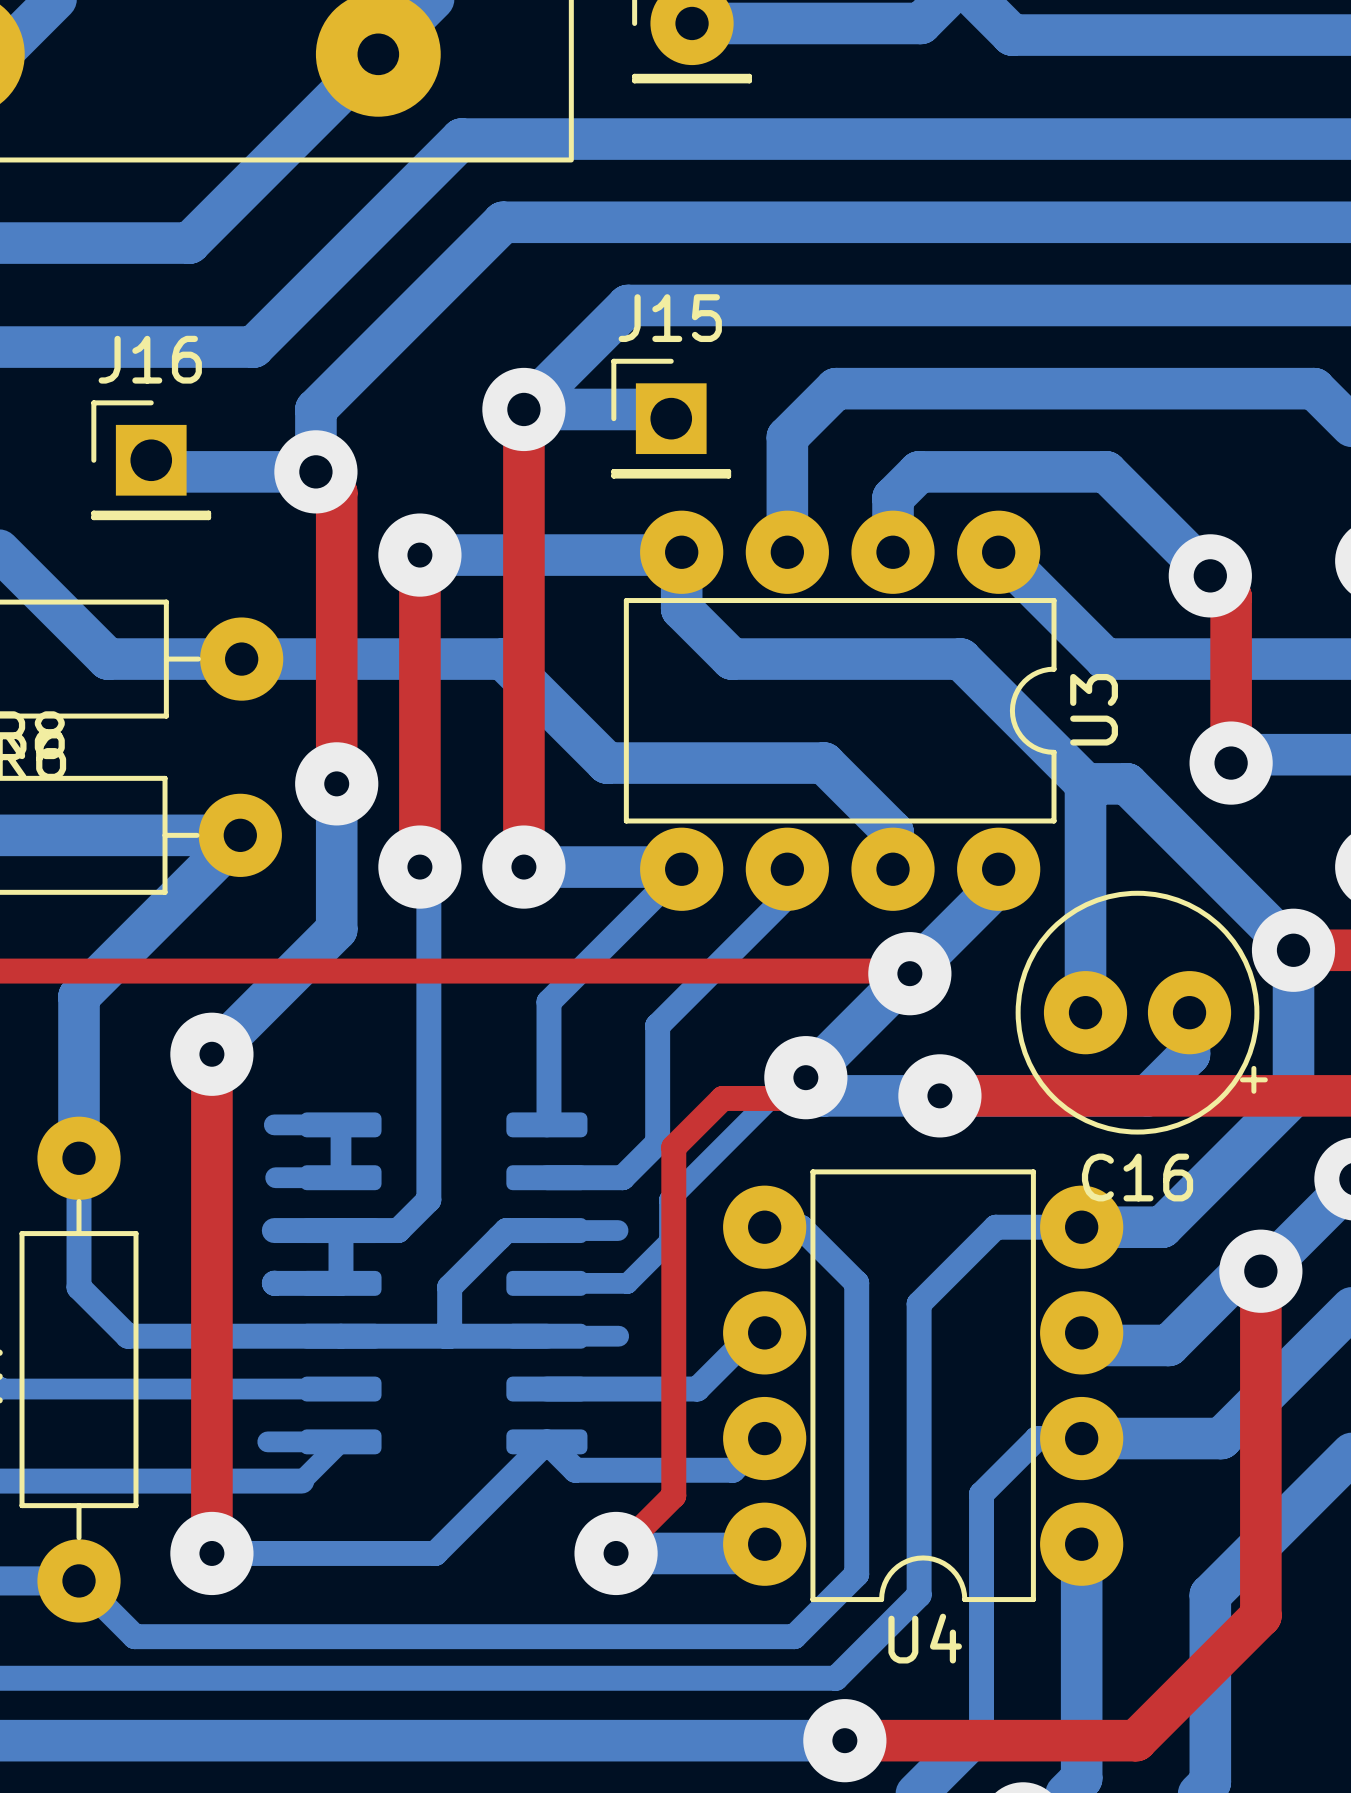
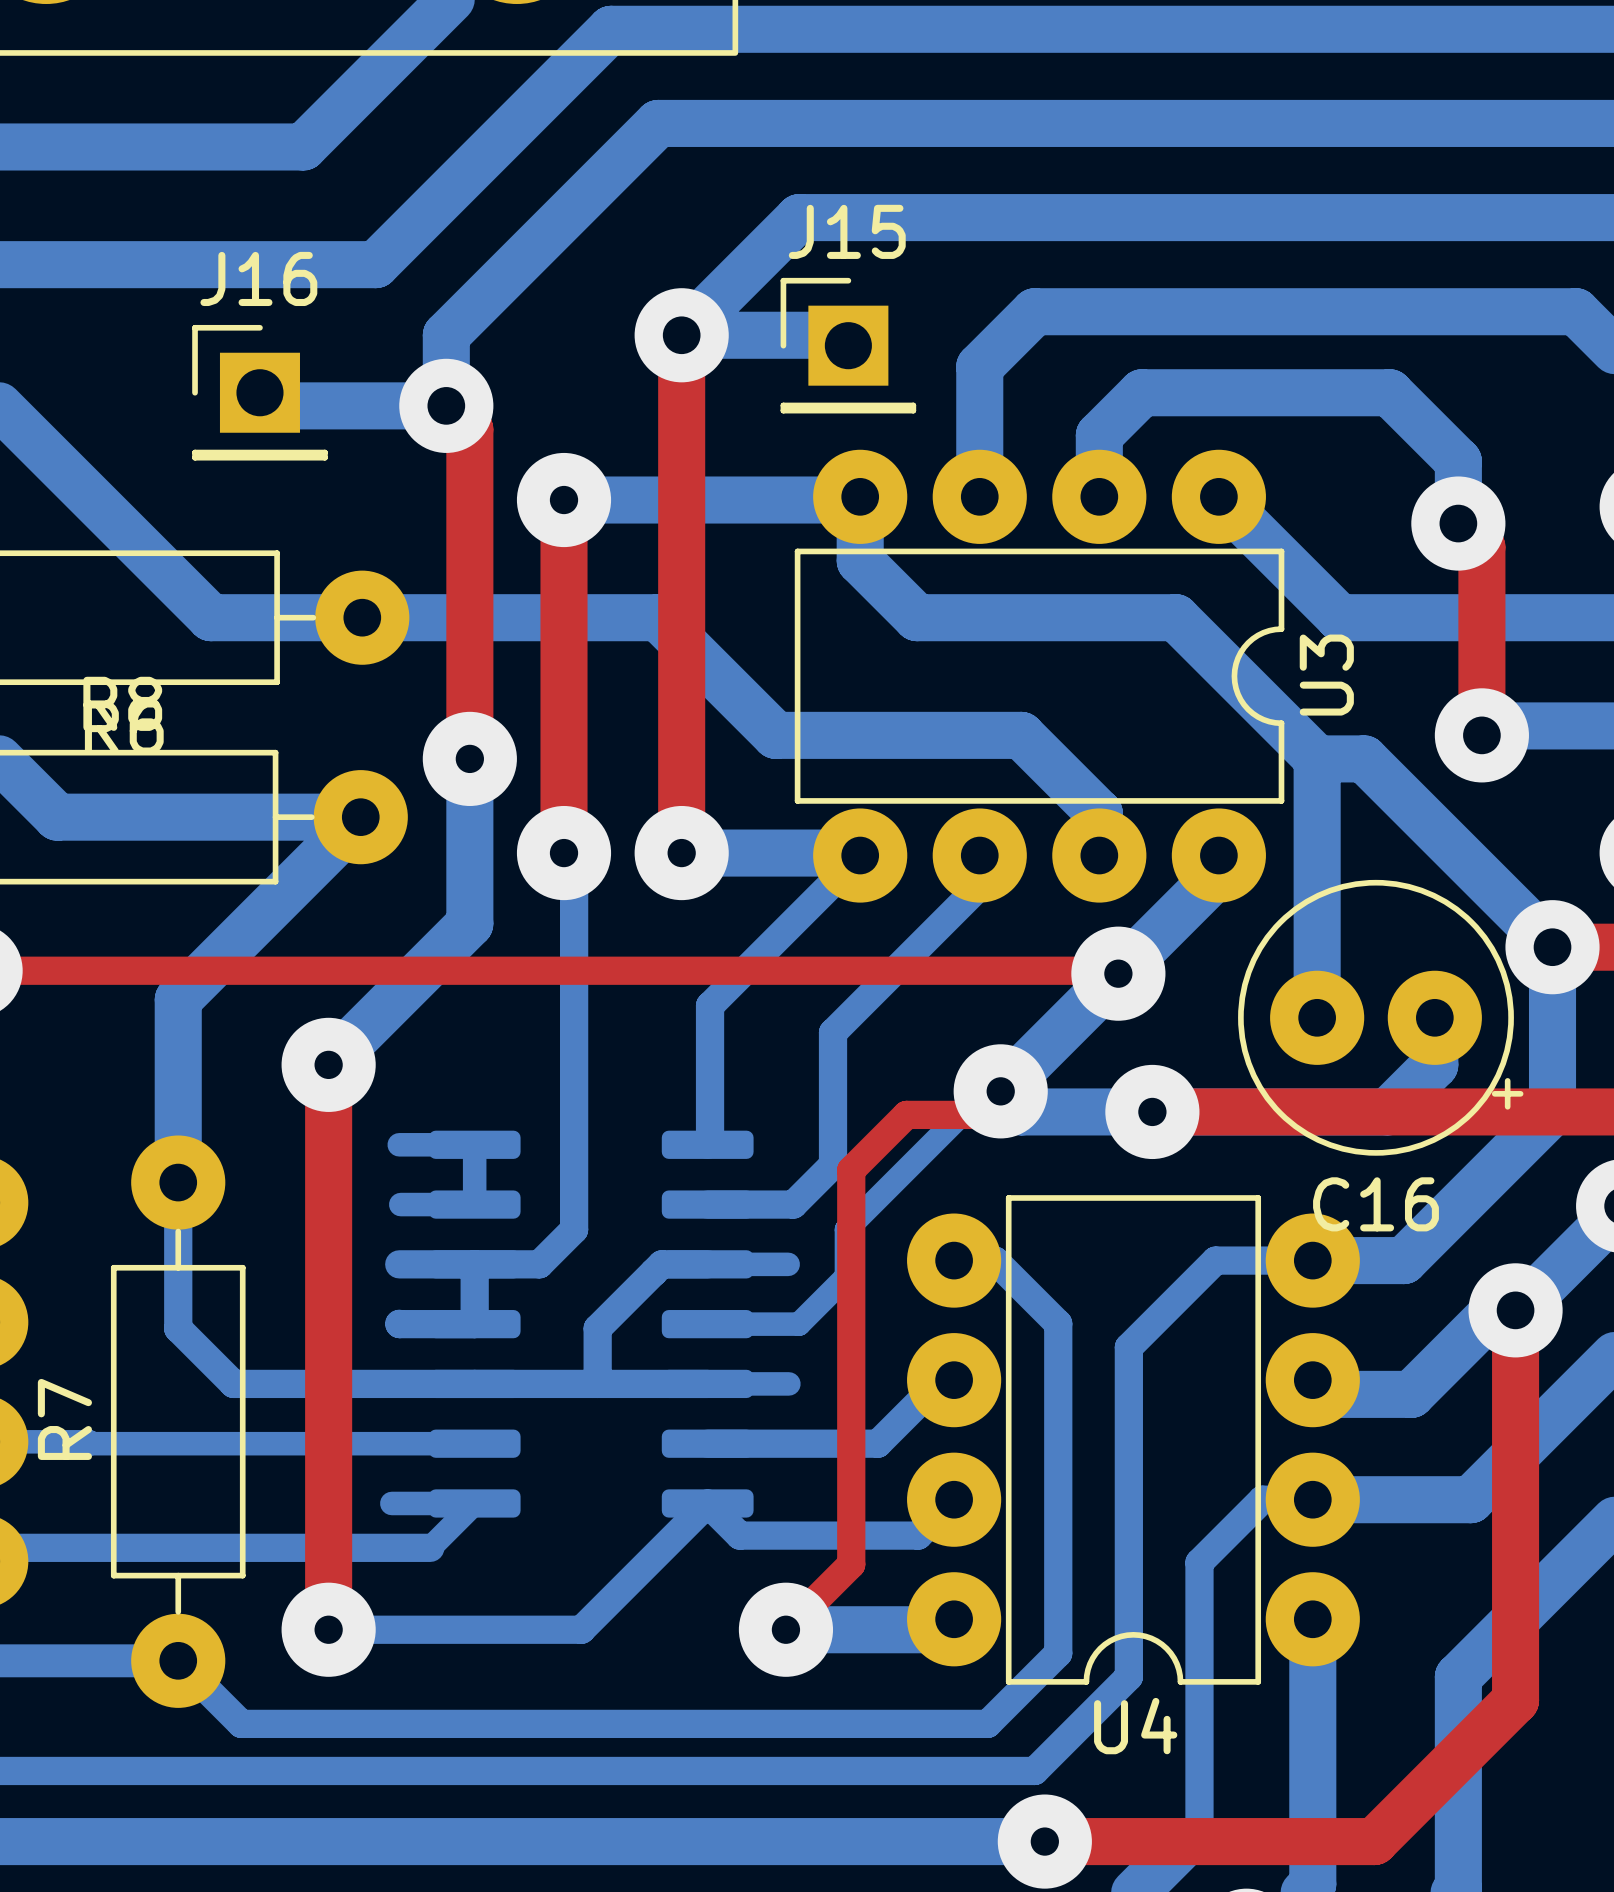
bottom track: (919, 471) (1106, 471) (1210, 575) -> (1128, 405) (1141, 392) (1389, 392) (1458, 461) (1458, 523)

